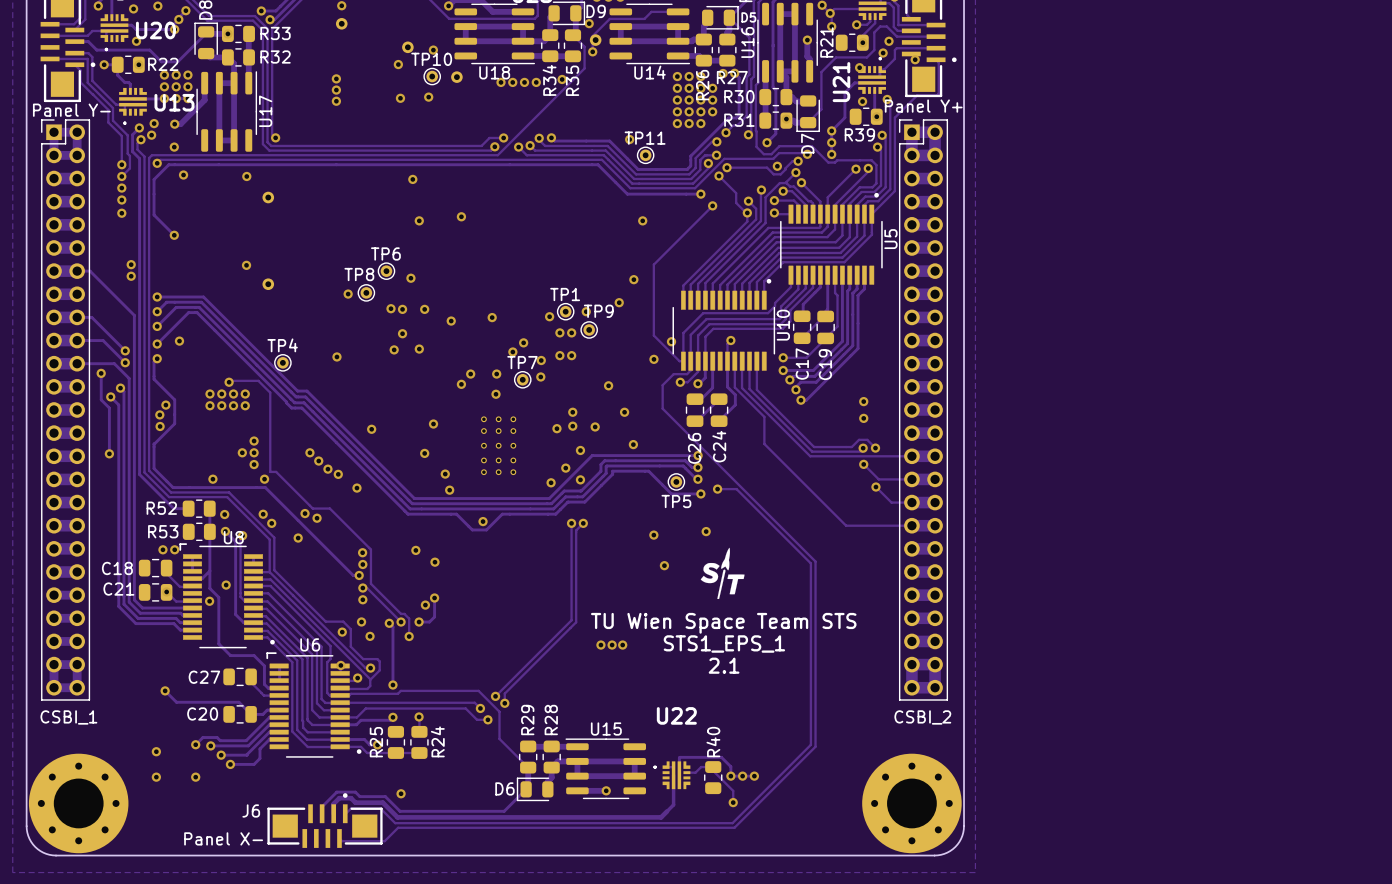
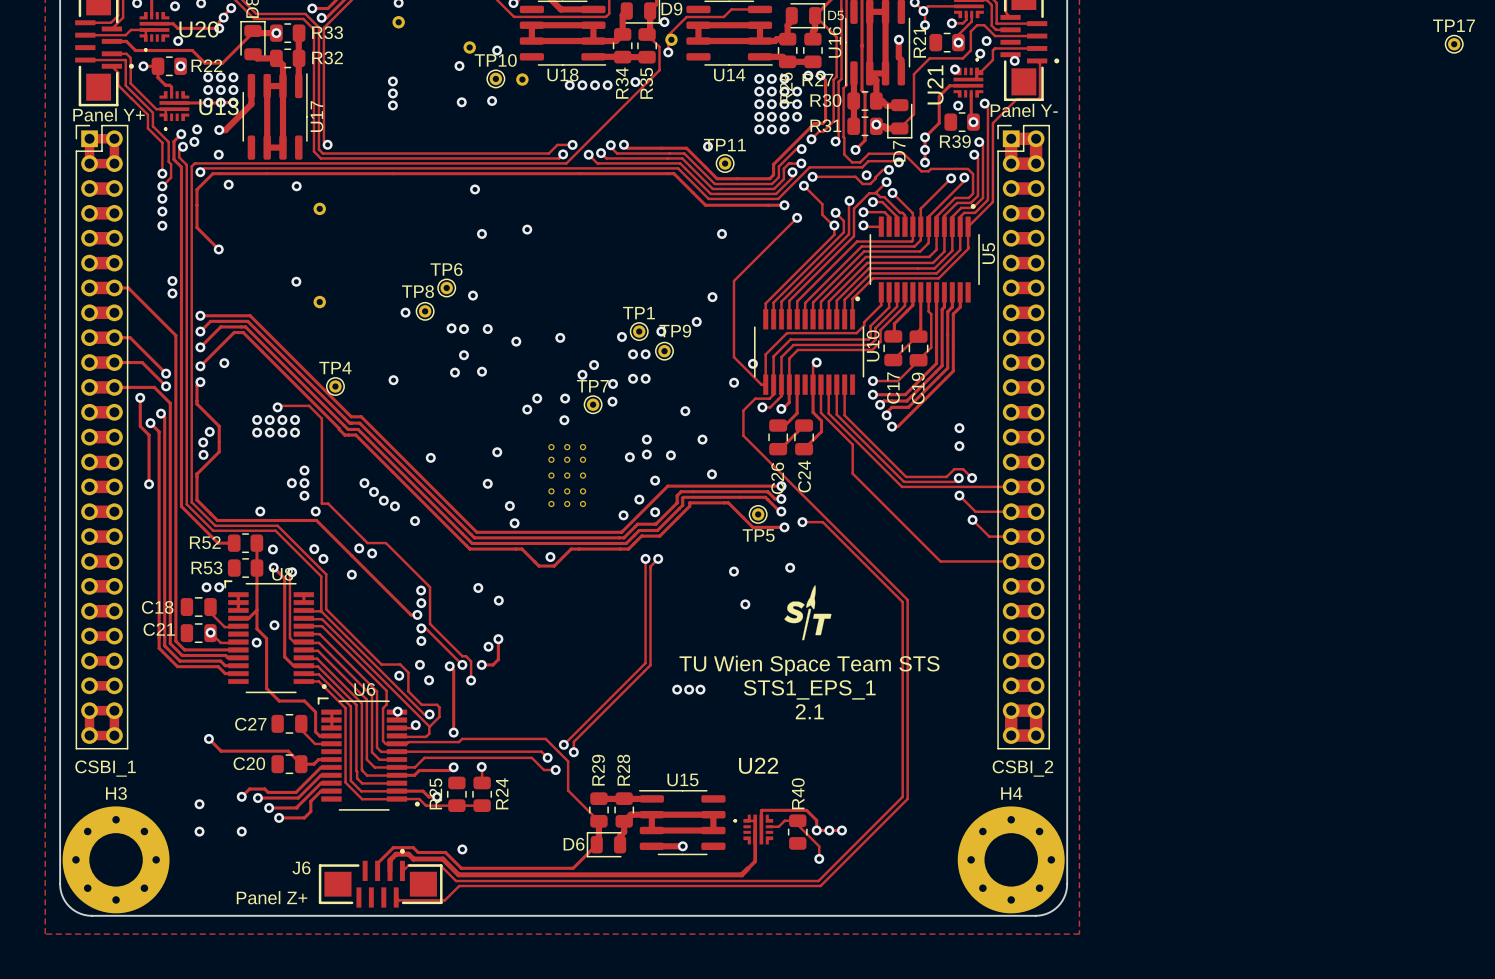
TP17: none -> (1454, 44)
part value: Panel Y+ (923, 106) -> Panel Y- (1024, 110)
part value: Panel Y- (71, 110) -> Panel Y+ (109, 114)
H3 name: none -> H3 (116, 793)
H4 name: none -> H4 (1011, 793)
J6 value: Panel X- (223, 838) -> Panel Z+ (272, 897)

